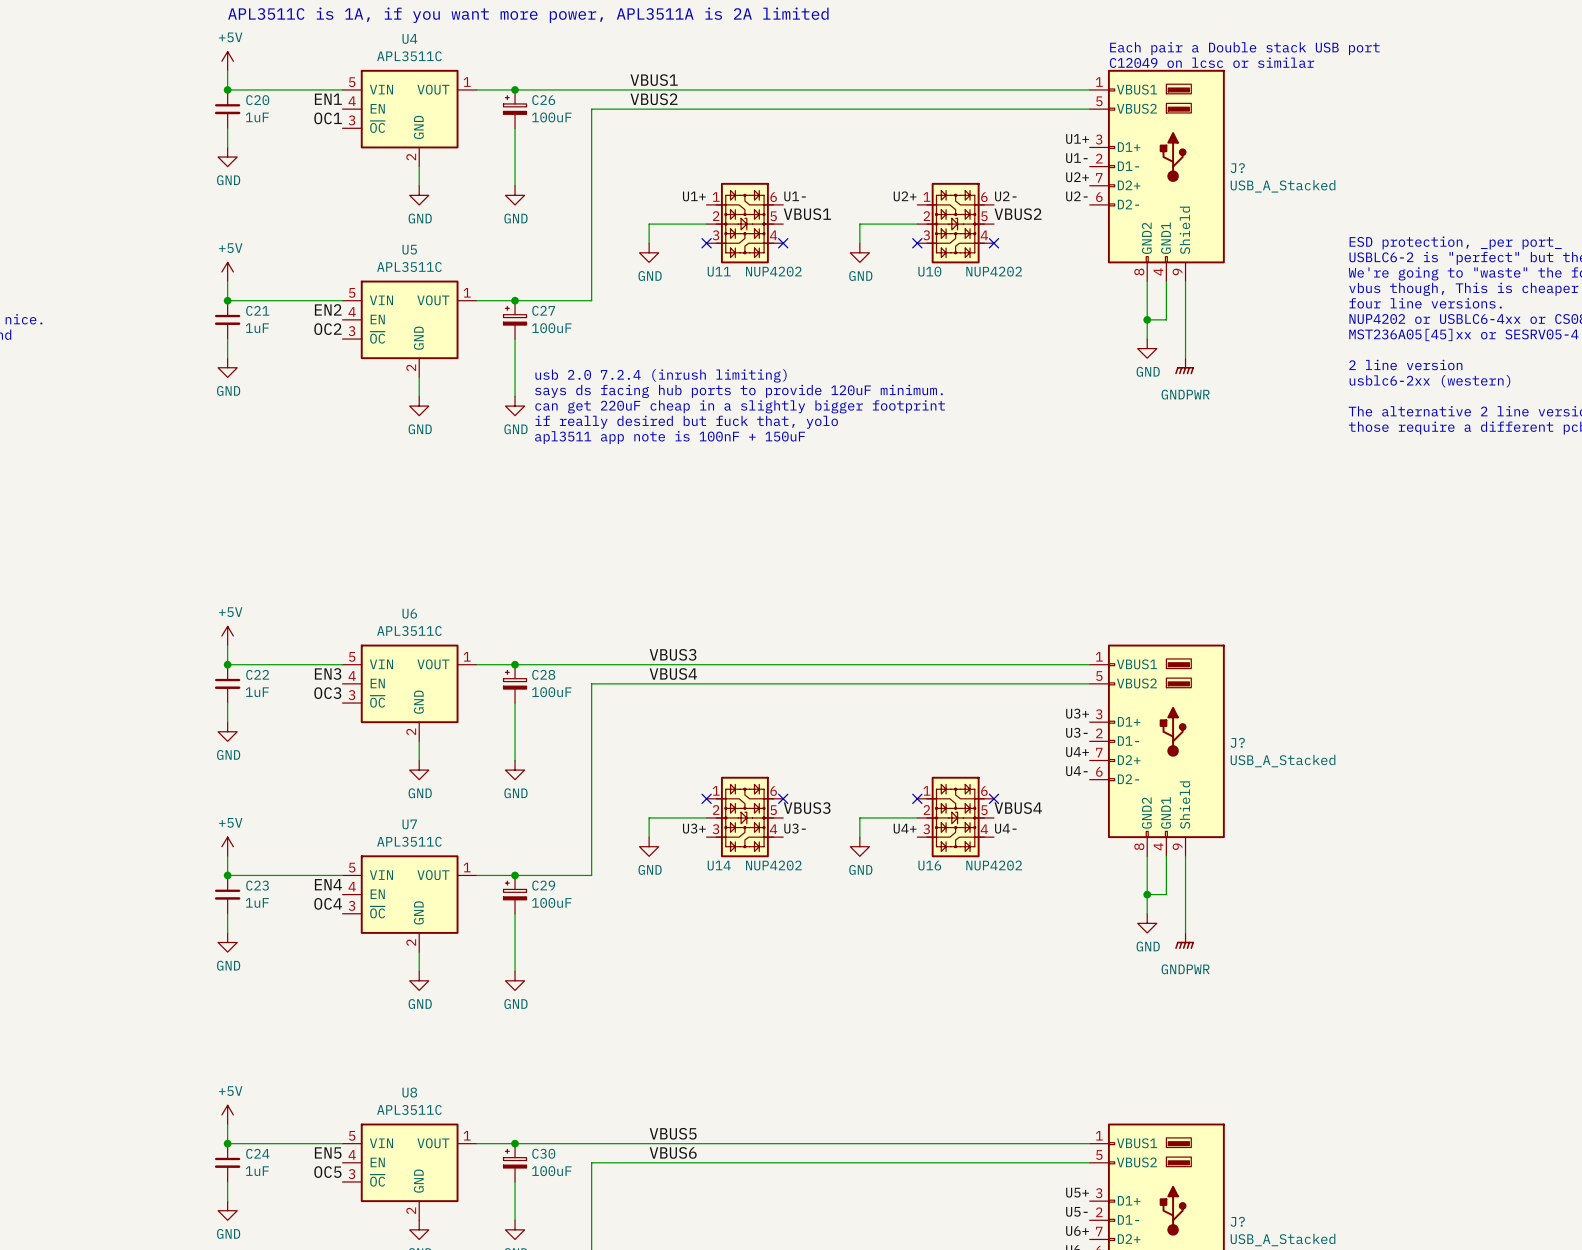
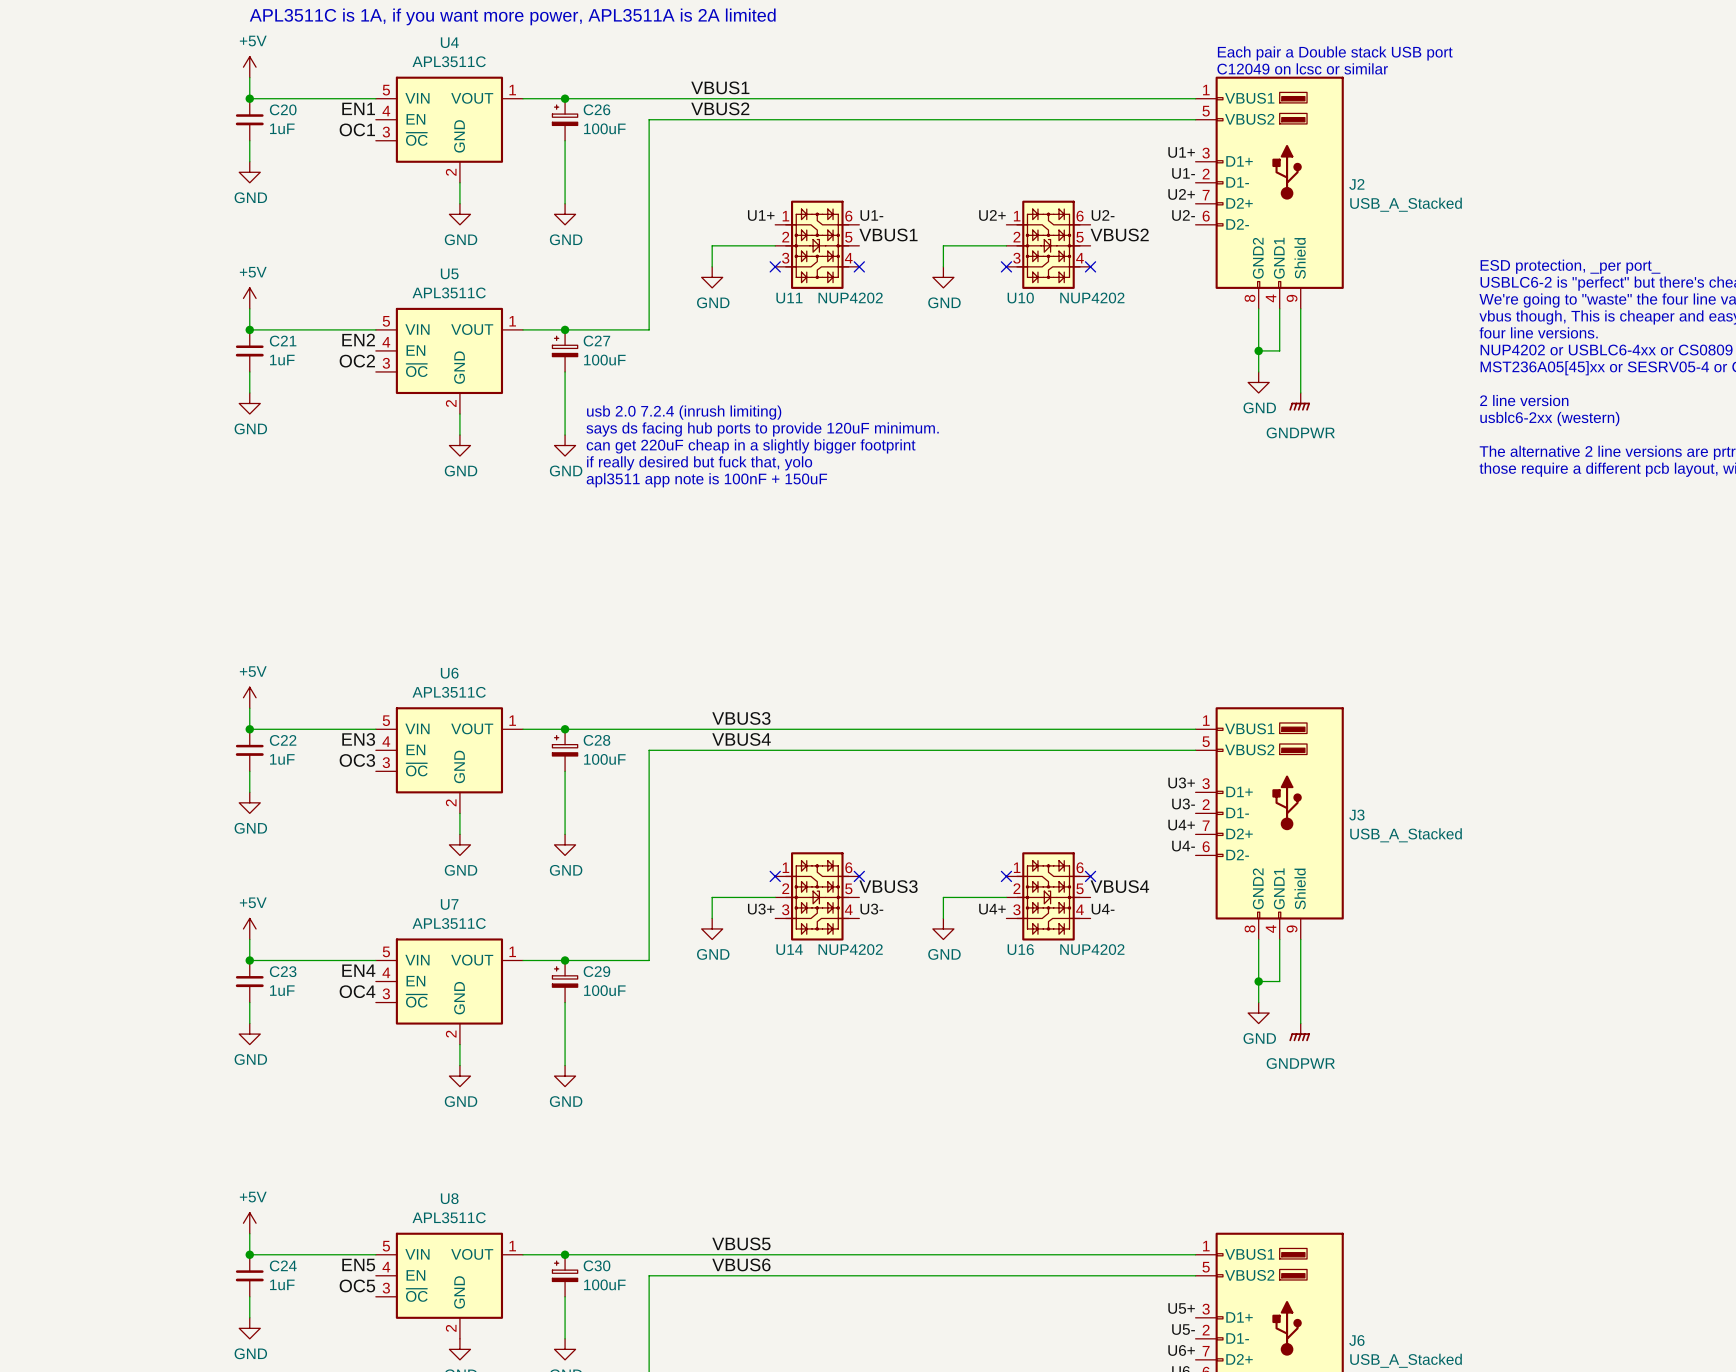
J? name: J? (1237, 168) -> J2 (1356, 184)
J? name: J? (1237, 742) -> J3 (1356, 815)
J? name: J? (1237, 1221) -> J6 (1356, 1340)

